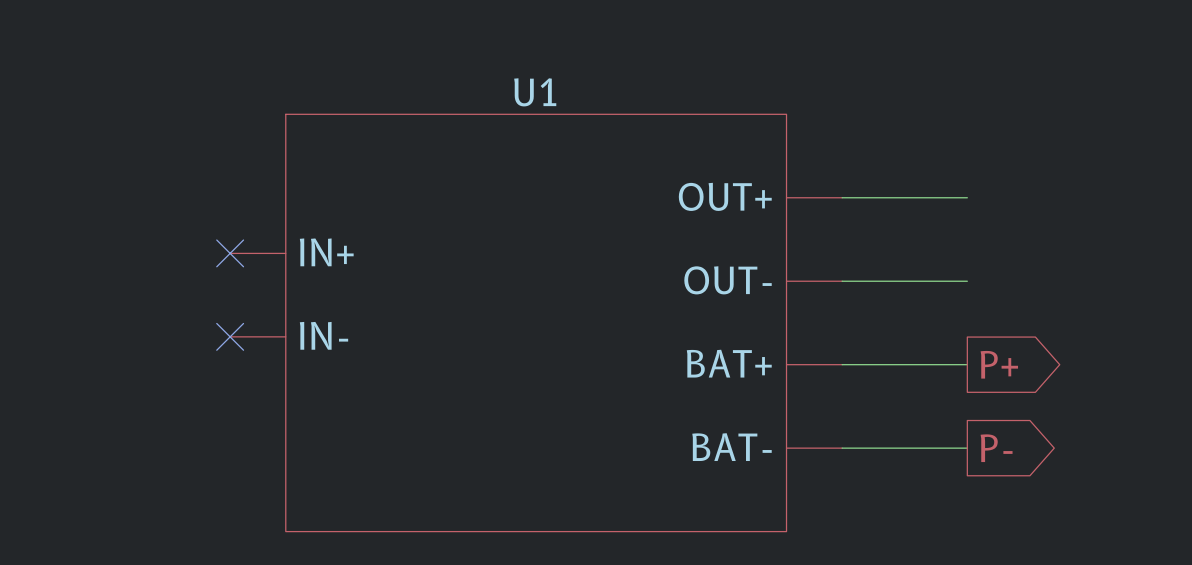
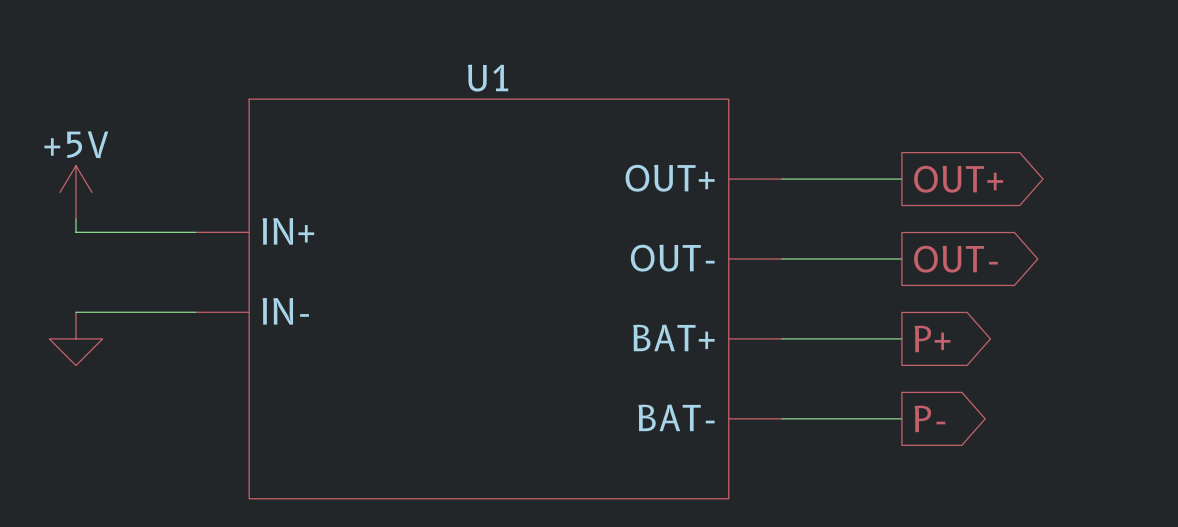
global label: none -> OUT+ (958, 179)
power symbol: none -> +5V (75, 192)
wire: none -> (75, 219) (75, 232) (195, 232)
no-connect mark: (230, 253) -> none
global label: none -> OUT- (955, 259)
wire: none -> (75, 312) (195, 312)
no-connect mark: (230, 336) -> none
power symbol: none -> (75, 338)

